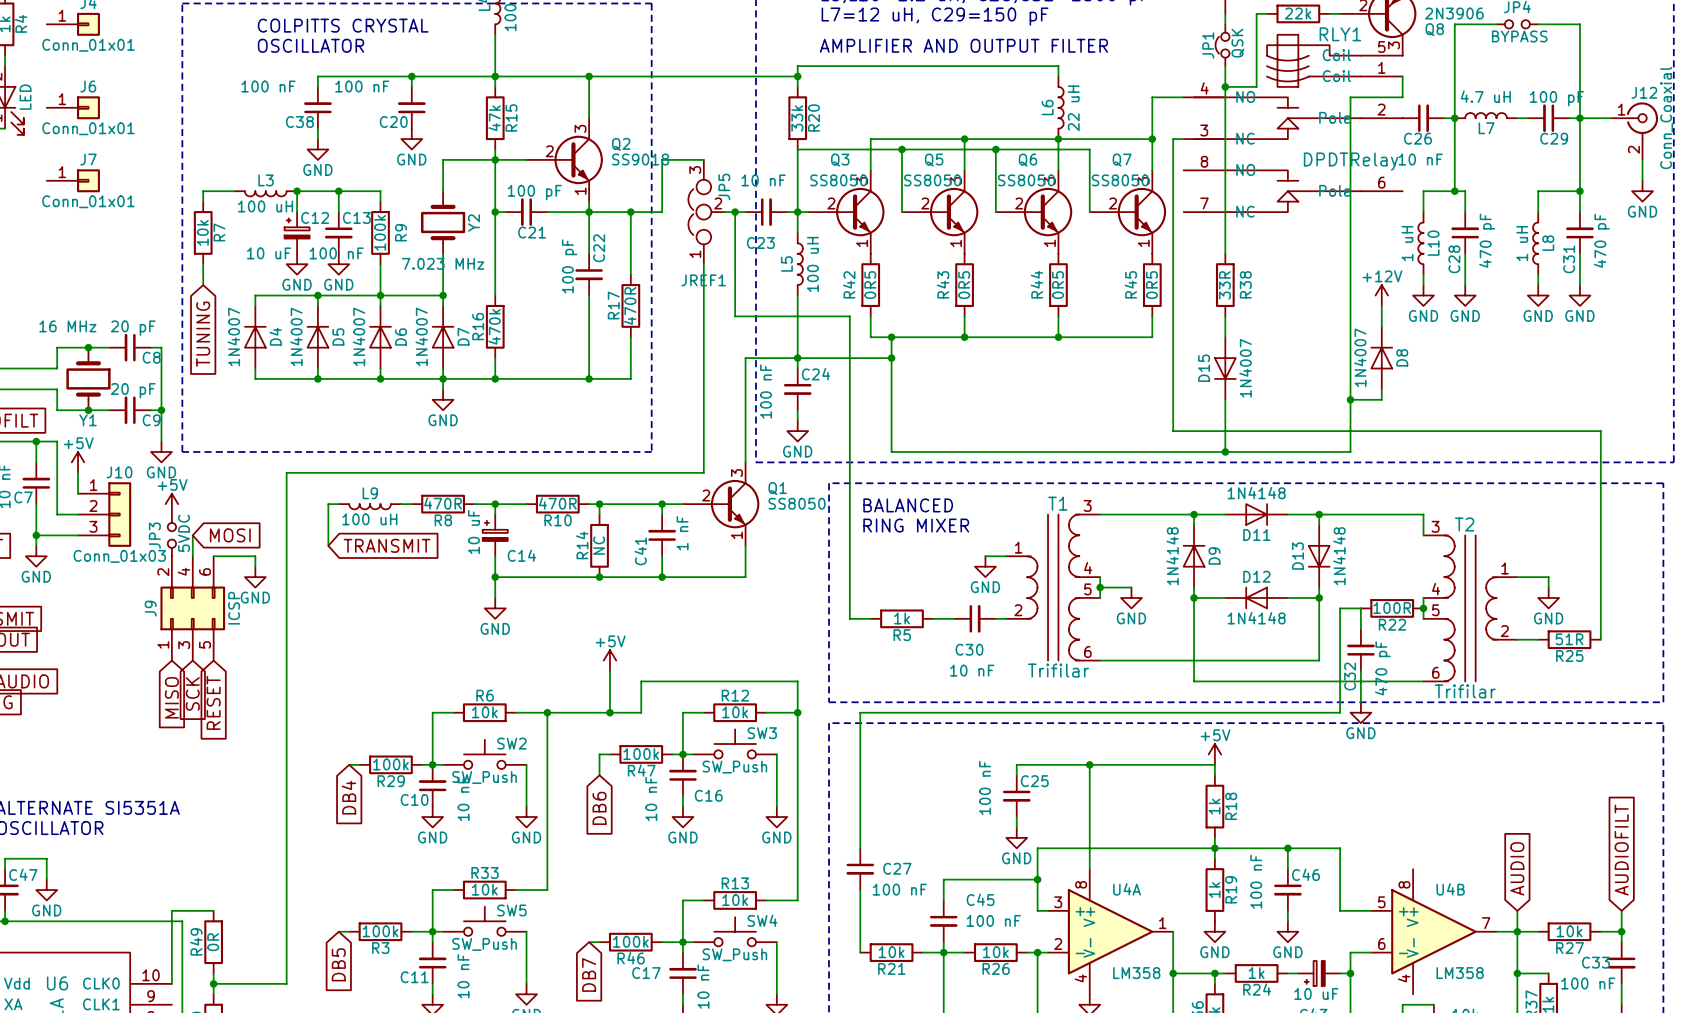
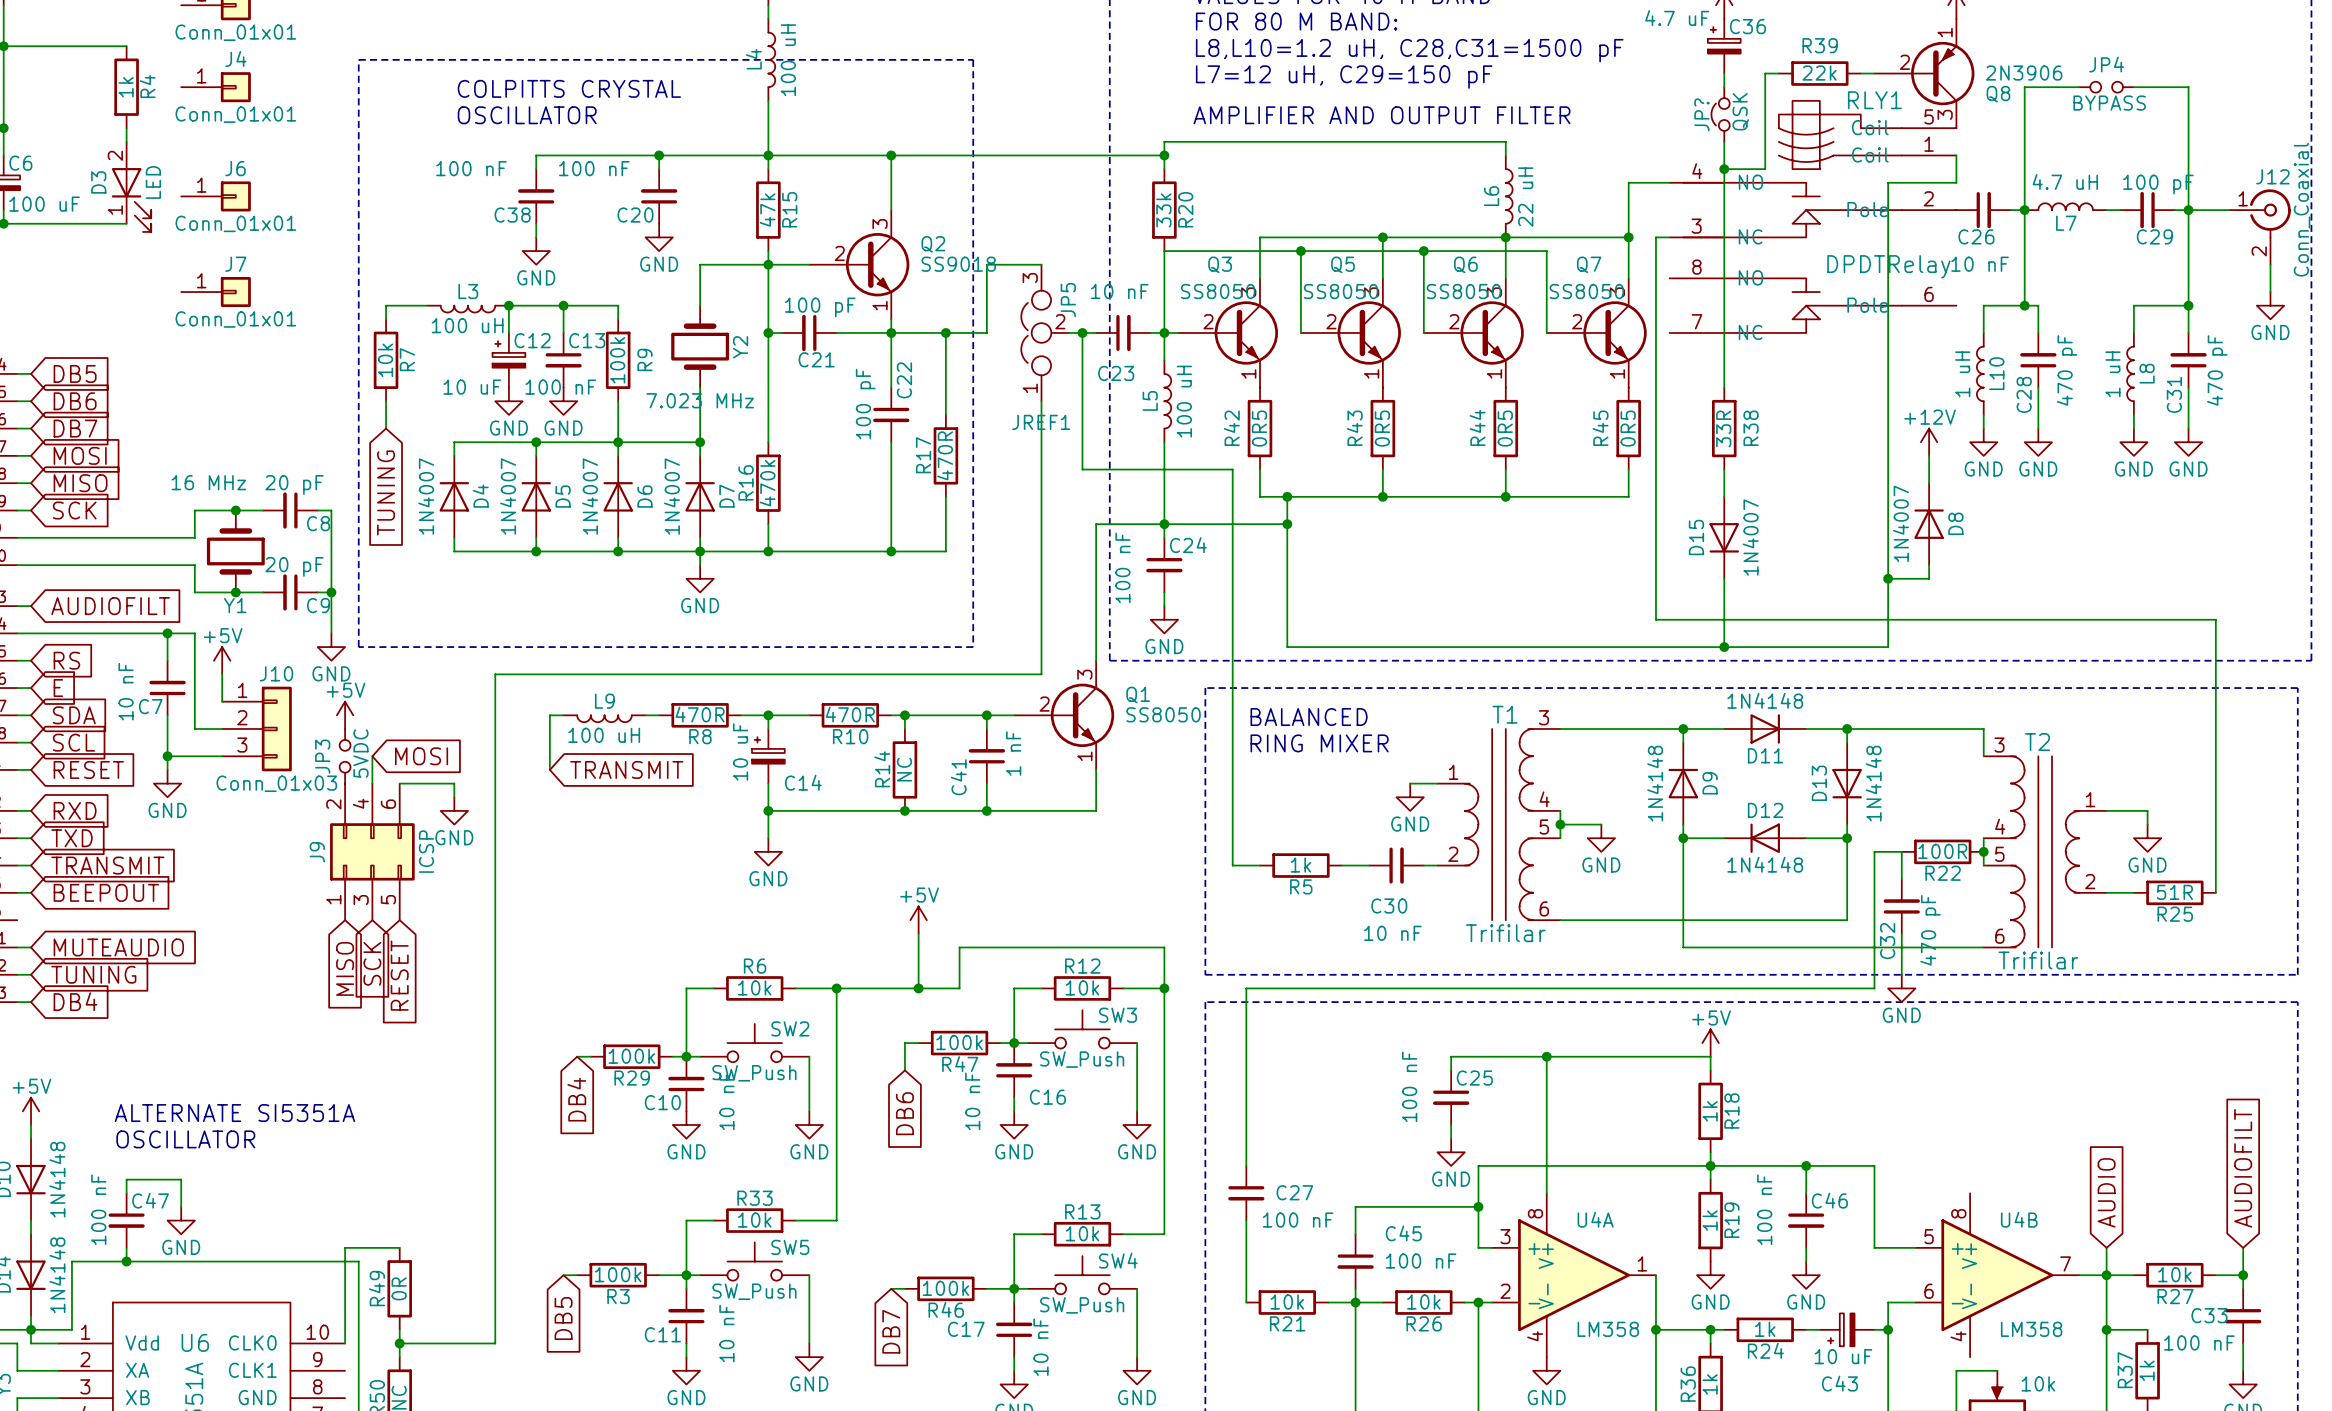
JP1 name: JP1 (1208, 45) -> JP? (1701, 114)

